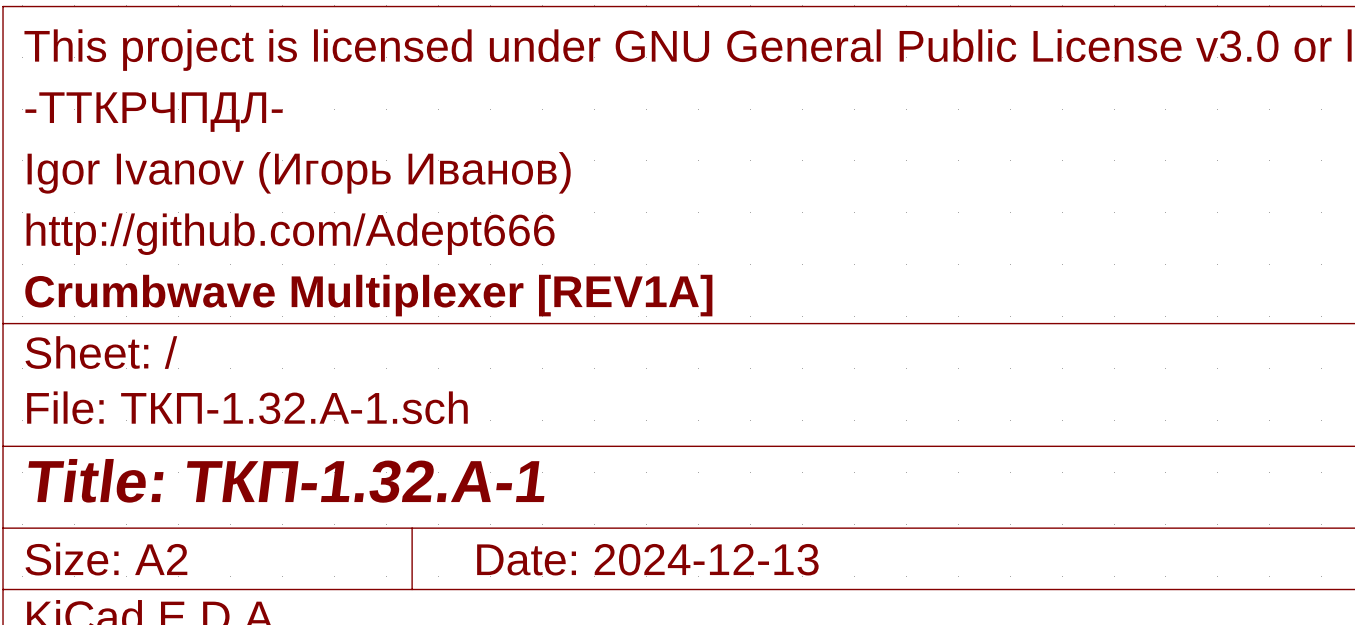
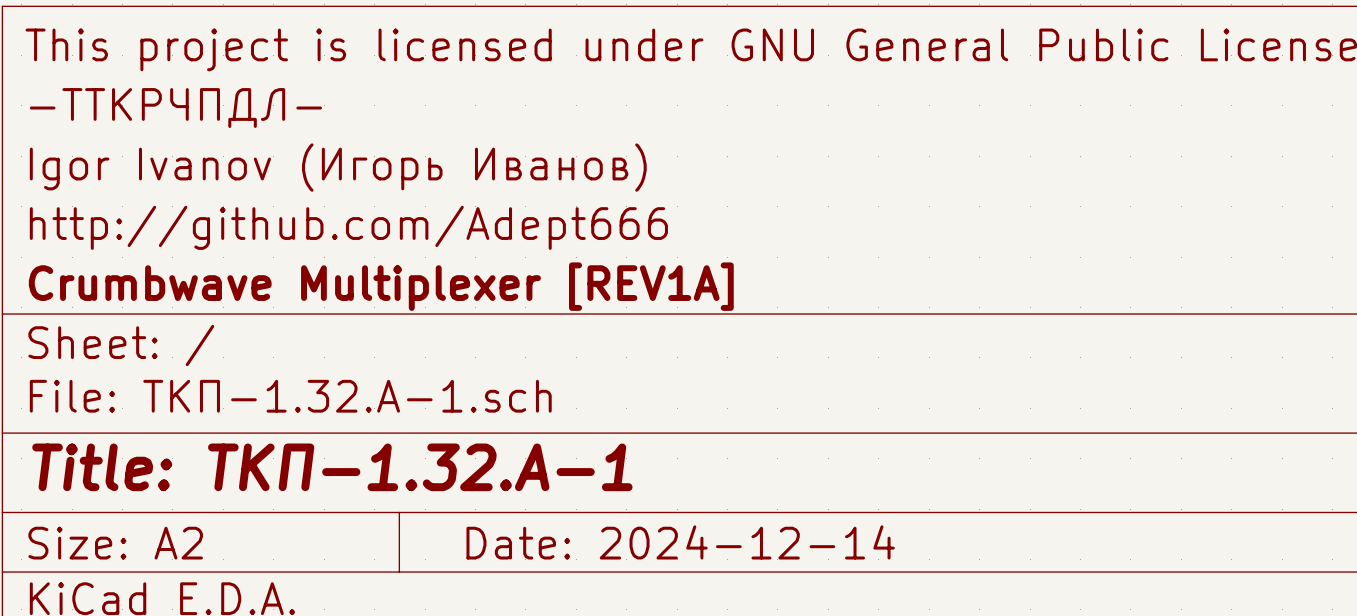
title block: Date: 2024-12-13 (647, 559) -> Date: 2024-12-14 (680, 542)

